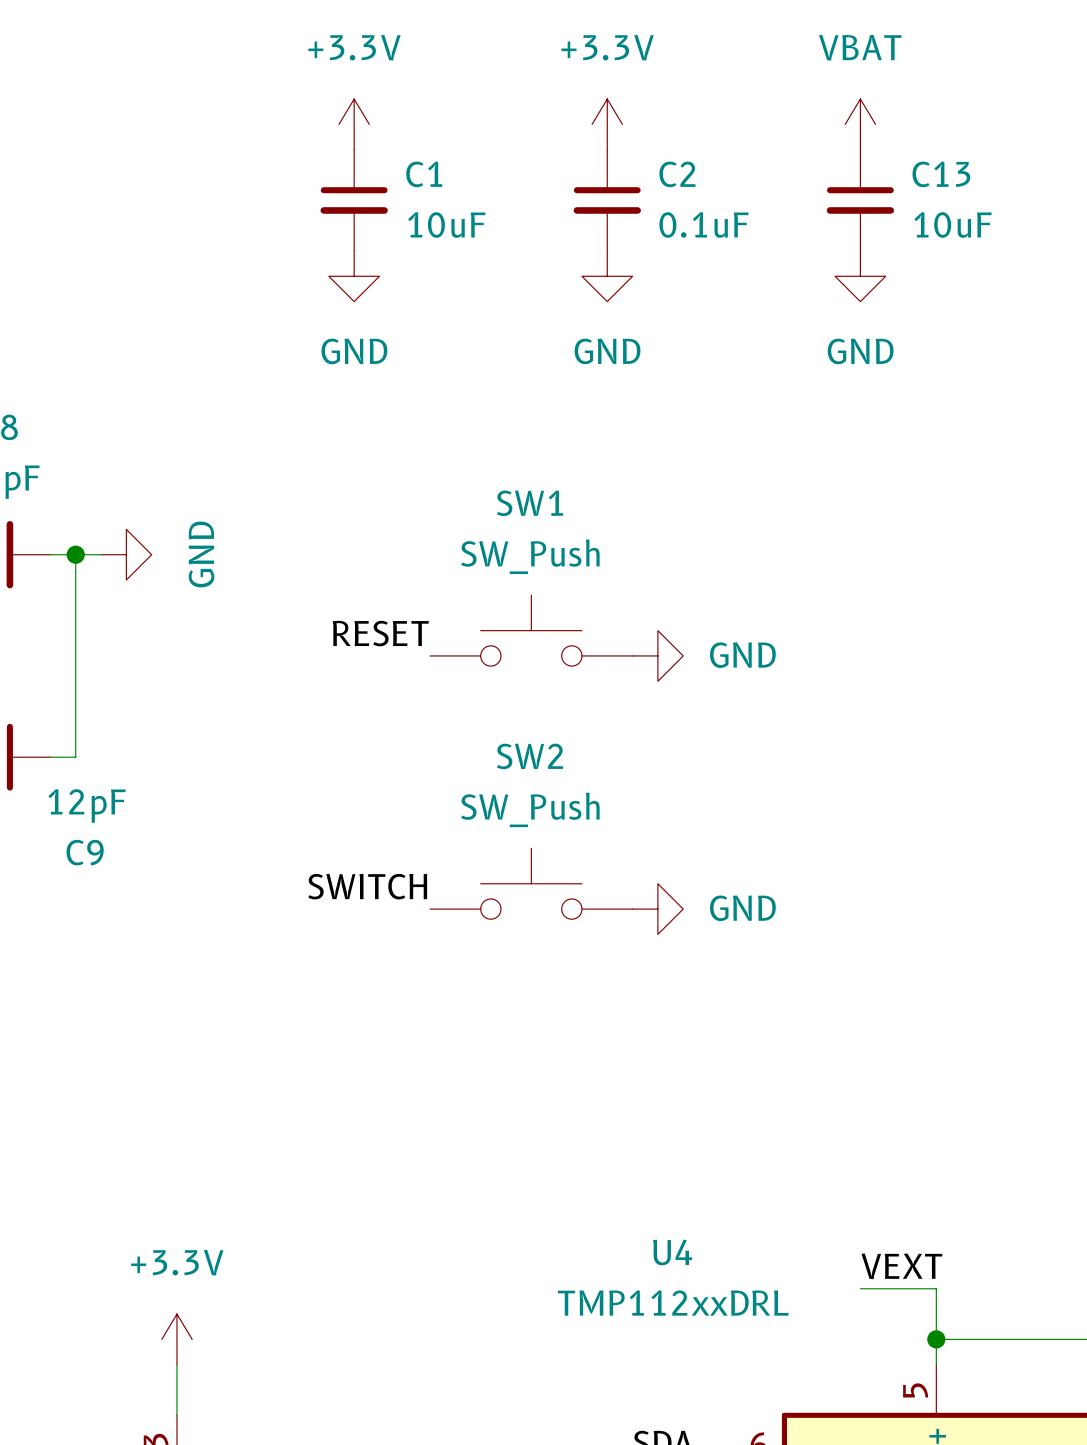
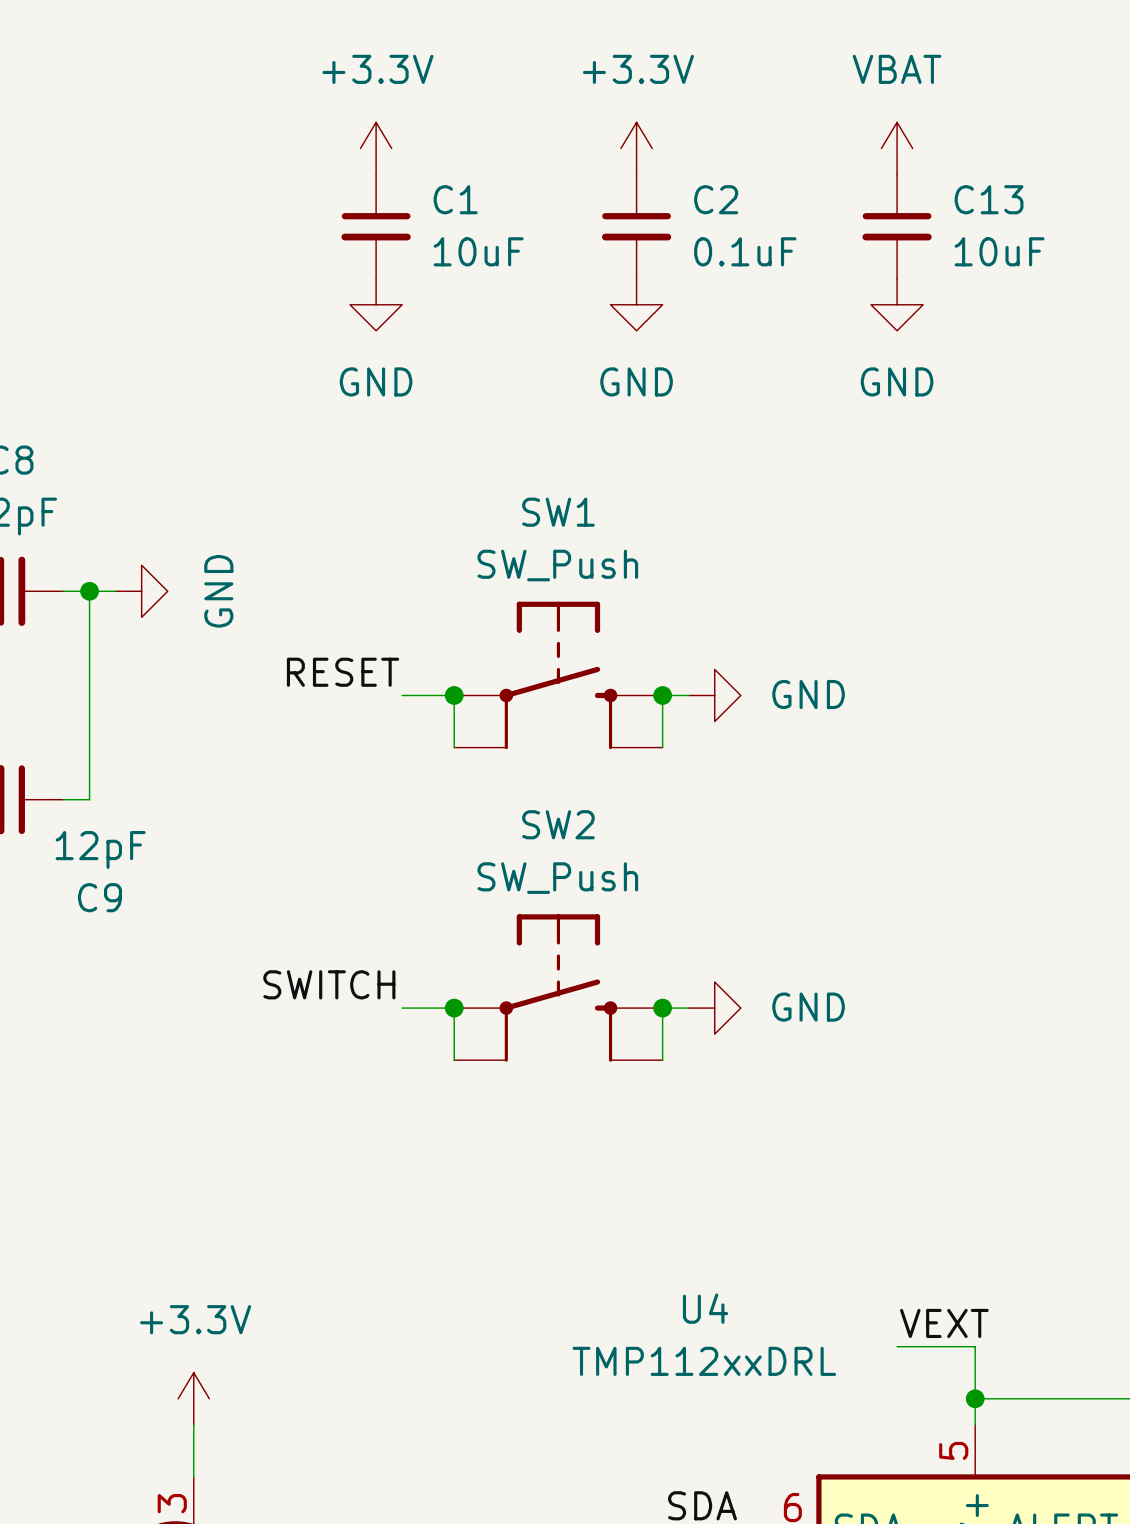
SW1 symbol: [430, 595, 633, 667] -> [454, 601, 663, 750]
label position: RESET (380, 633) -> RESET (343, 672)
wire: none -> (402, 695) (454, 695) (454, 747)
junction: none -> (454, 695)
junction: none -> (662, 695)
wire: none -> (688, 695) (662, 695) (662, 747)
power symbol position: GND (657, 655) -> GND (714, 695)
SW2 symbol: [430, 848, 633, 920] -> [454, 914, 663, 1062]
label position: SWITCH (367, 886) -> SWITCH (329, 984)
power symbol position: GND (657, 909) -> GND (714, 1008)
wire: none -> (402, 1008) (454, 1008) (454, 1060)
junction: none -> (454, 1008)
junction: none -> (662, 1008)
wire: none -> (688, 1008) (662, 1008) (662, 1060)

